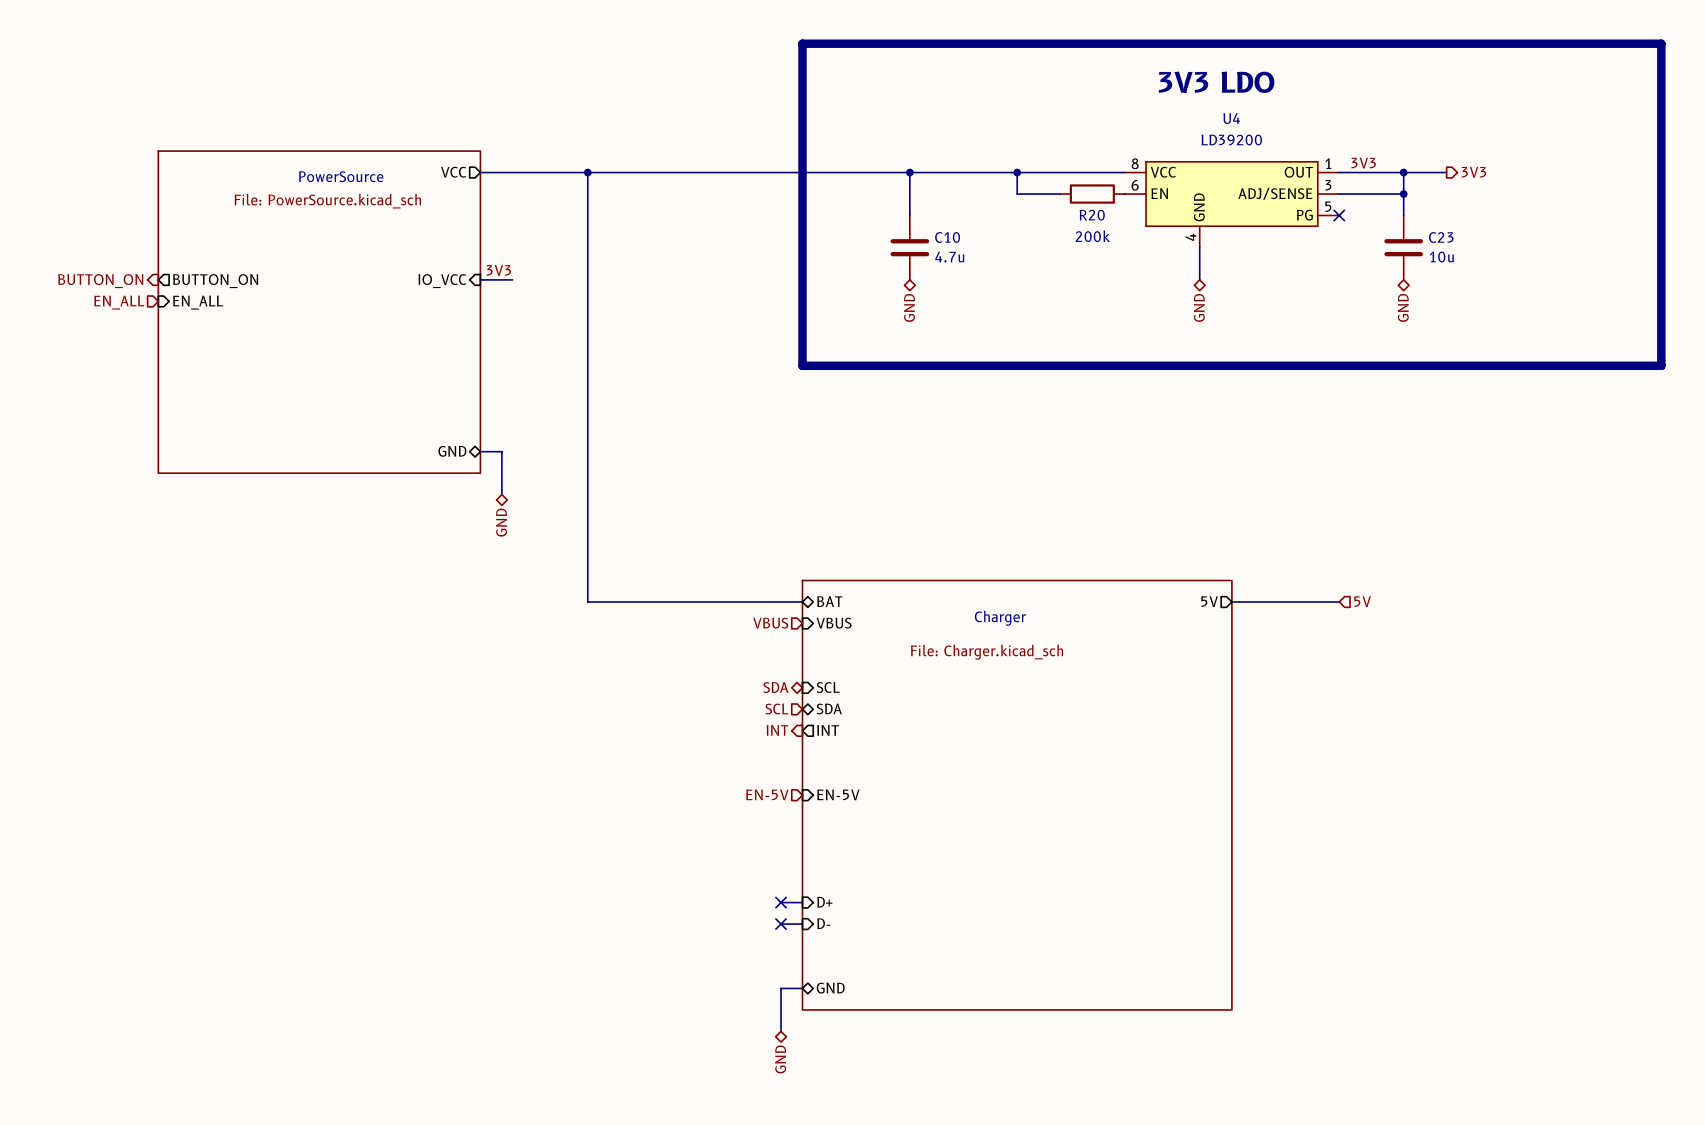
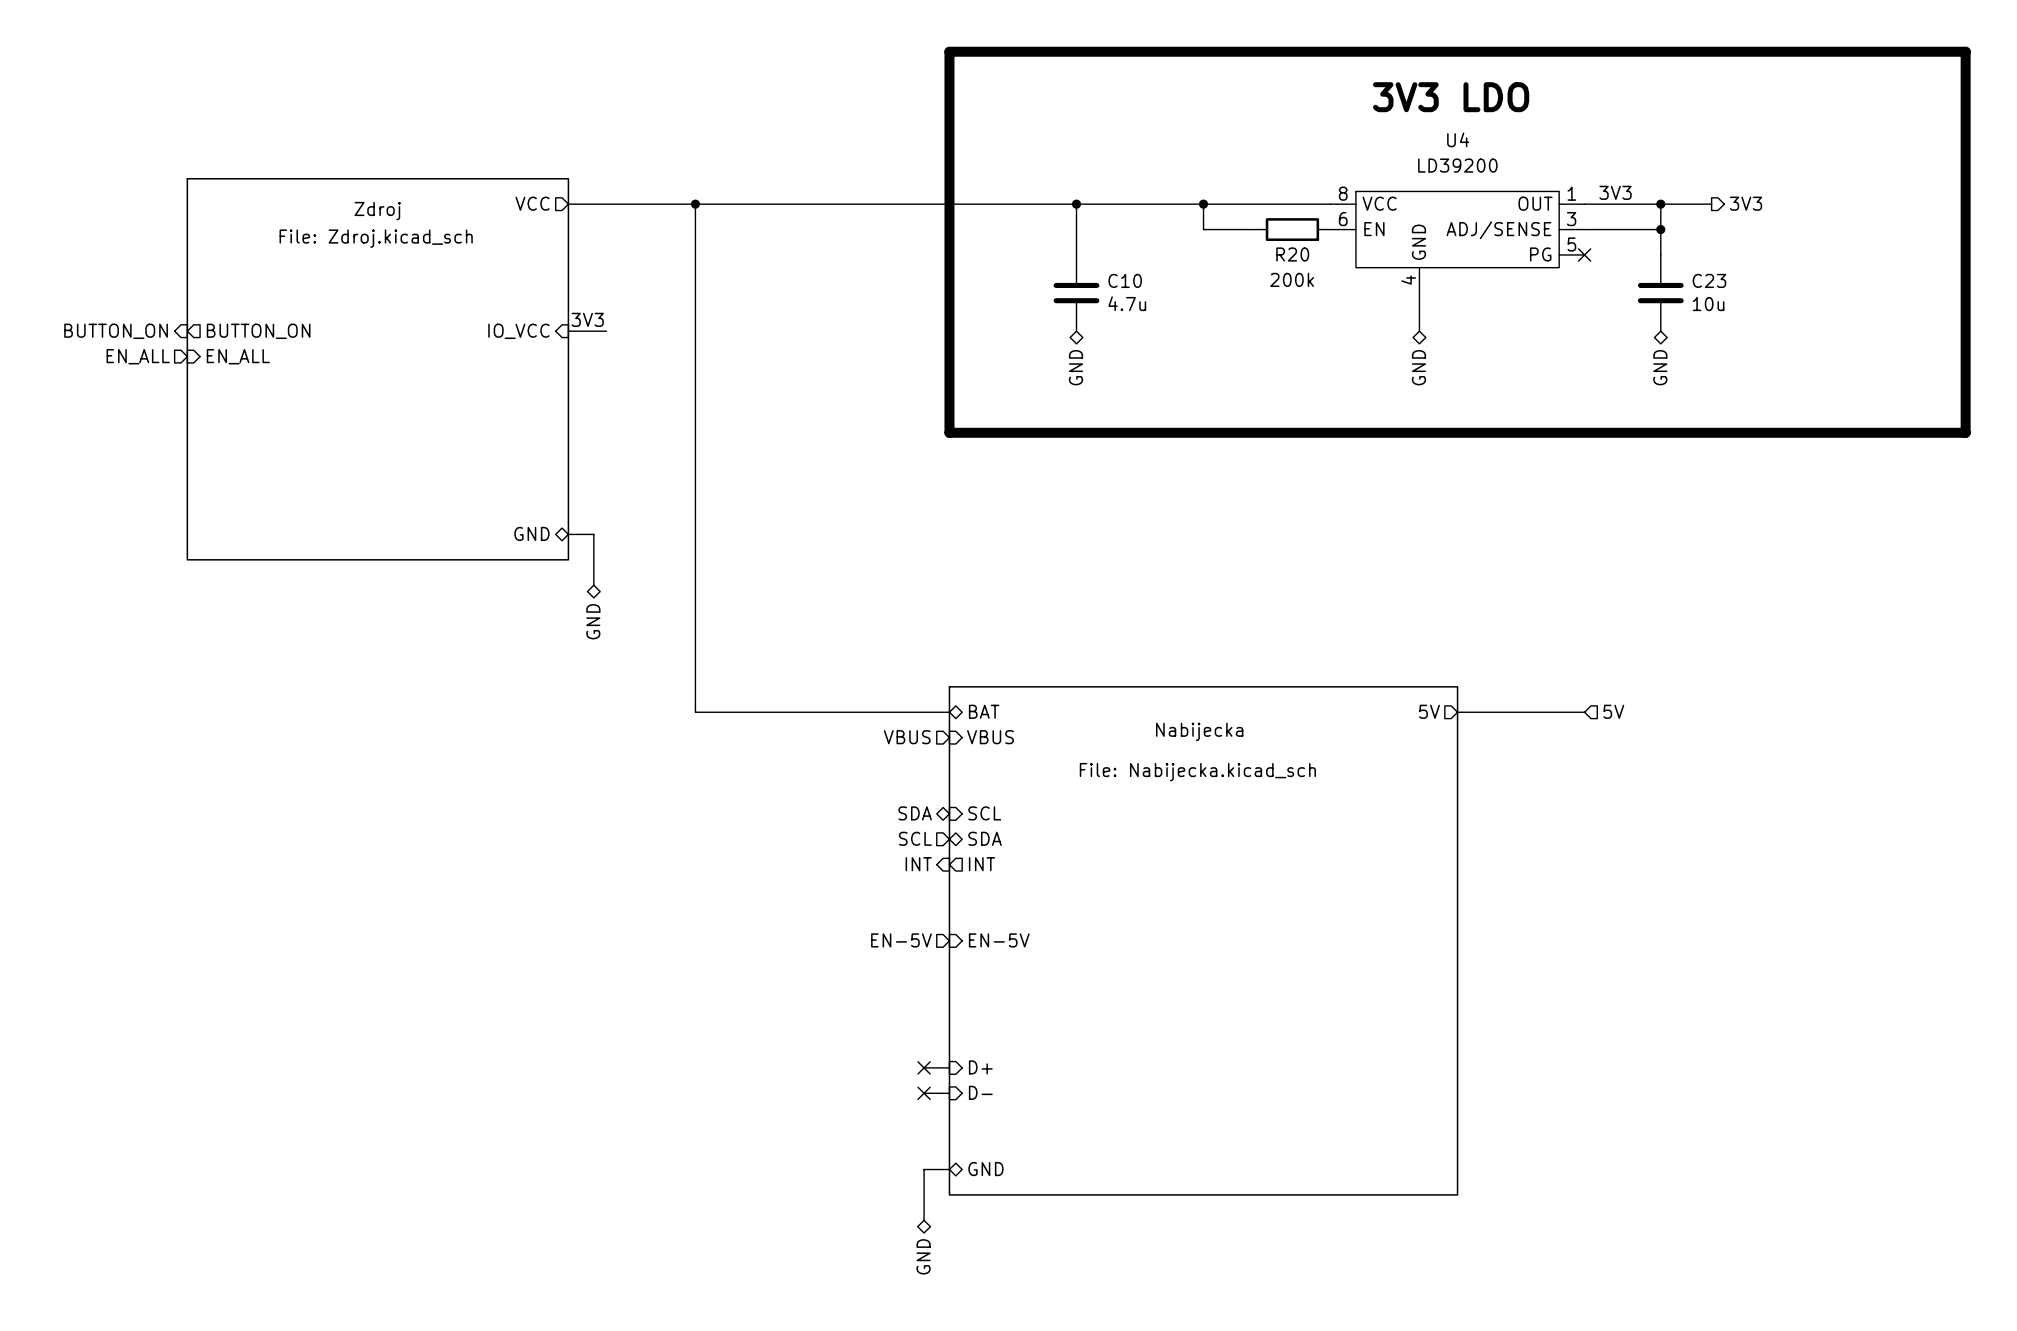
sheet PowerSource name: PowerSource (341, 176) -> Zdroj (377, 211)
sheet PowerSource value: File: PowerSource.kicad_sch (327, 201) -> File: Zdroj.kicad_sch (376, 238)
sheet Charger name: Charger (1000, 618) -> Nabijecka (1199, 731)
sheet Charger value: File: Charger.kicad_sch (987, 652) -> File: Nabijecka.kicad_sch (1197, 772)

